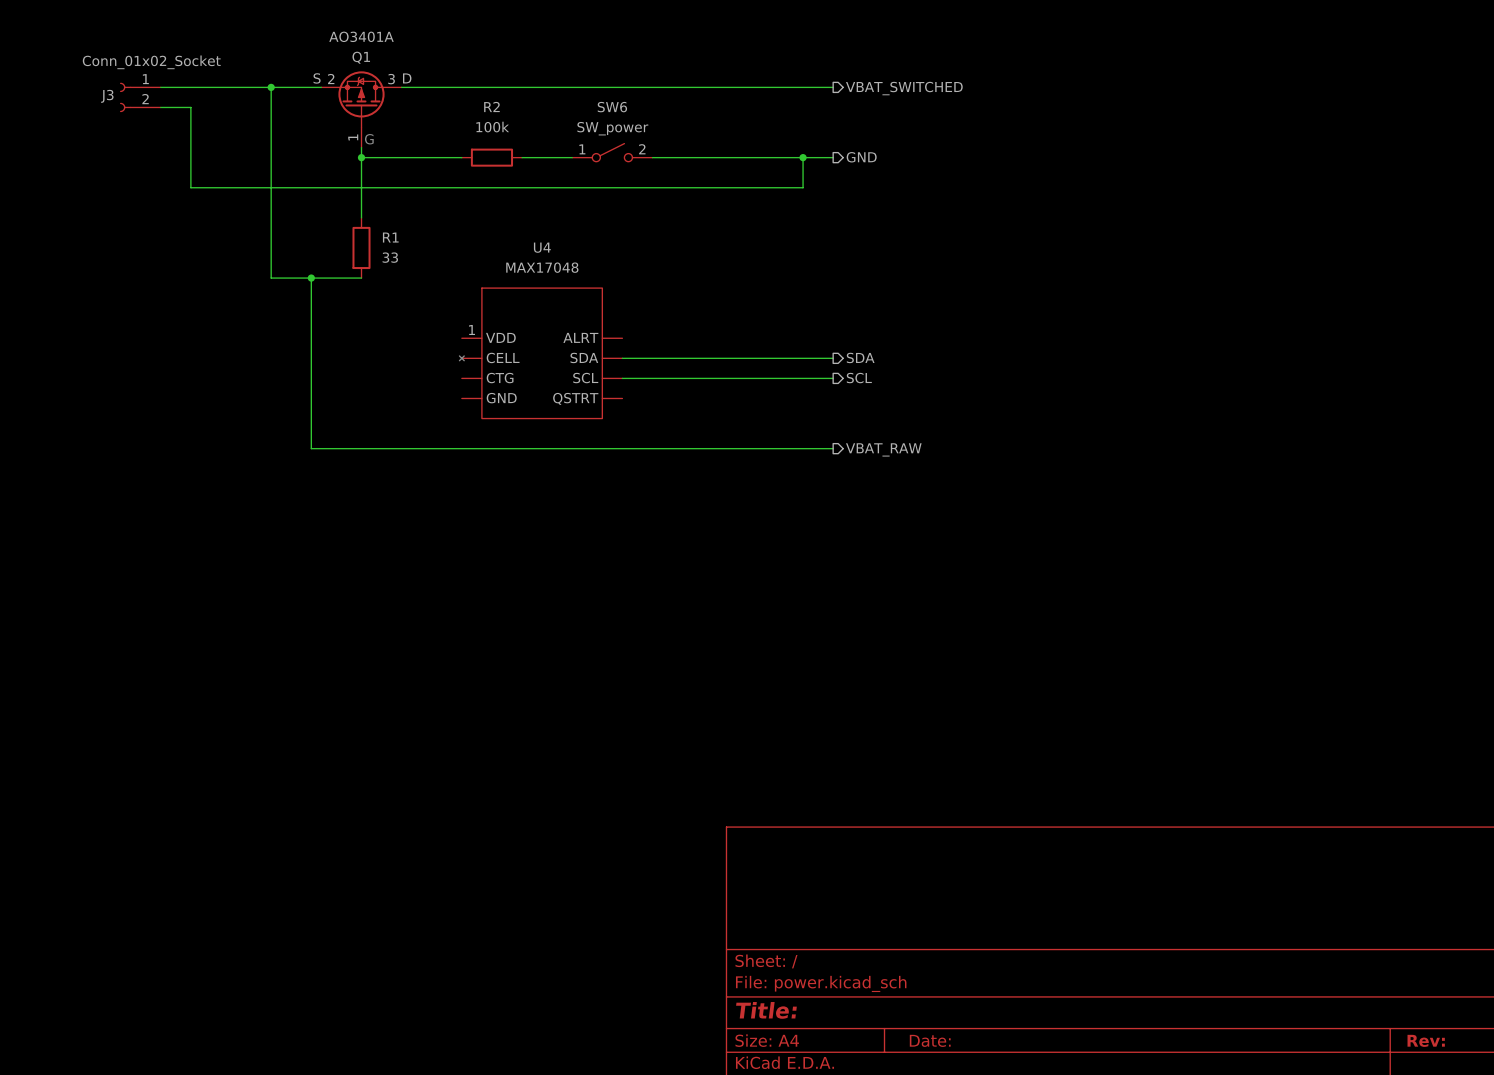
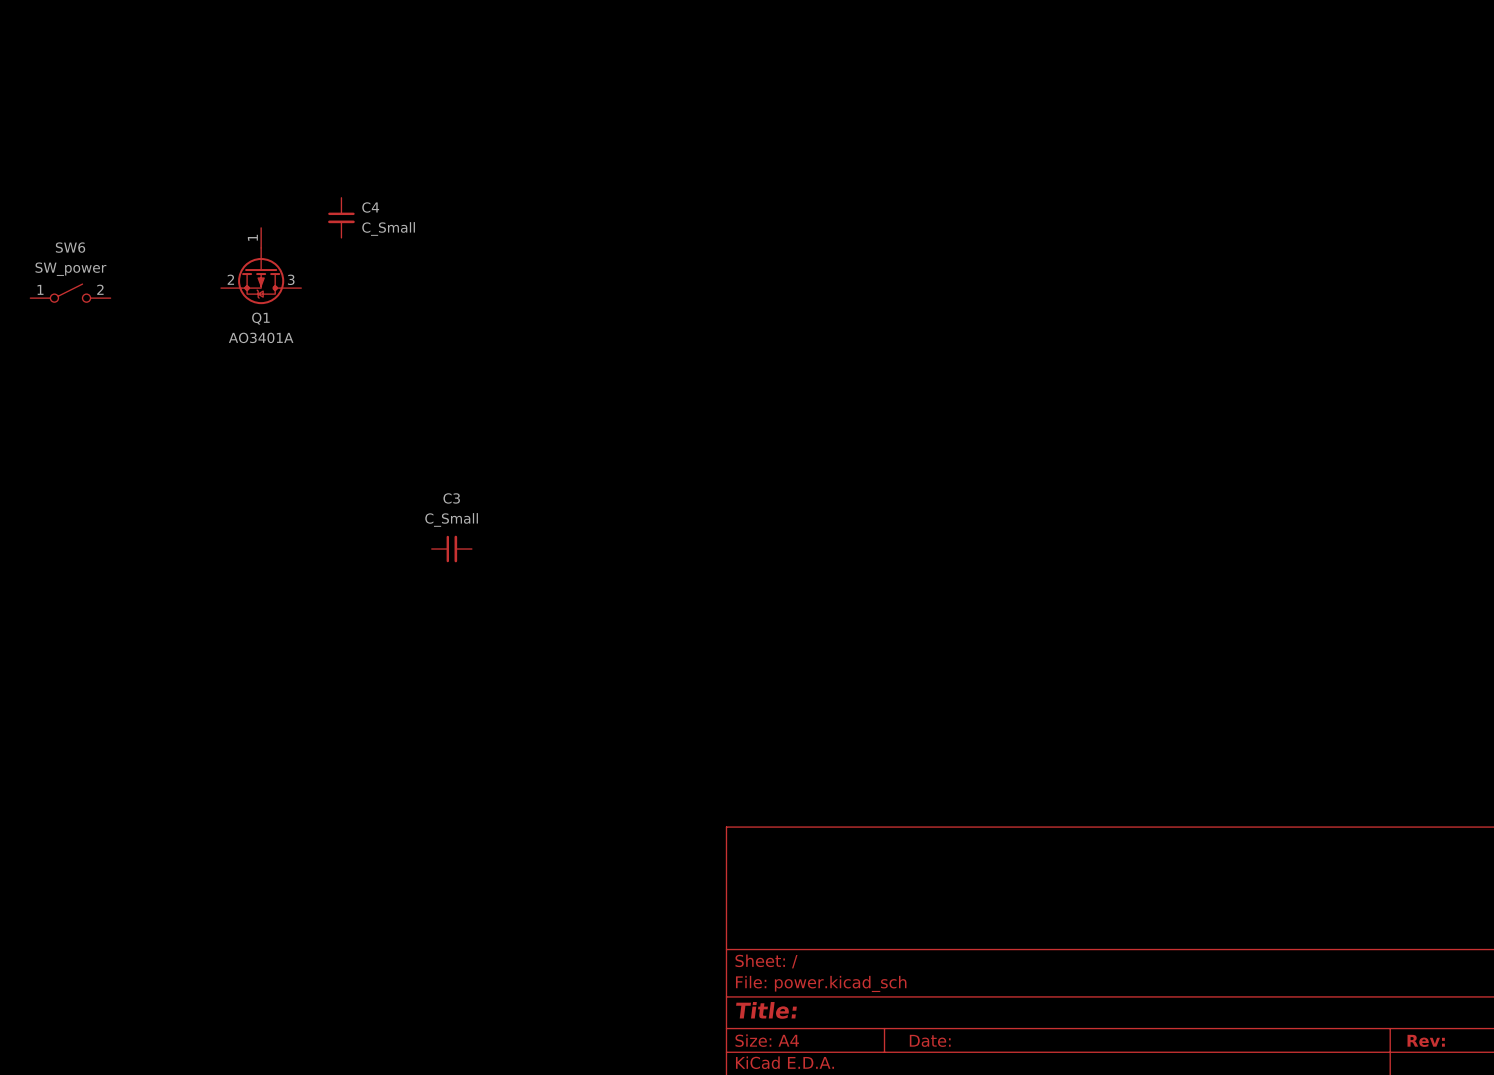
label: S (317, 78) -> none
label: D (407, 78) -> none
wire: (160, 87) (321, 87) -> none
wire: (271, 87) (271, 278) (361, 278) -> none
junction: (271, 87) -> none
wire: (401, 87) (833, 87) -> none
hierarchical label: VBAT_SWITCHED (904, 88) -> none
J3: Conn_01x02_Socket (140, 97) -> none
Q1 flip: as is (361, 99) -> up-down (261, 276)
wire: (160, 107) (190, 107) (190, 187) (803, 187) (803, 157) -> none
Q1 position: (361, 109) -> (261, 266)
text: G (369, 139) -> none
wire: (361, 147) (361, 217) -> none
SW6 position: (612, 152) -> (70, 293)
wire: (361, 157) (461, 157) -> none
junction: (361, 157) -> none
R2: 100k (491, 157) -> none
wire: (522, 157) (572, 157) -> none
wire: (652, 157) (833, 157) -> none
junction: (803, 157) -> none
hierarchical label: GND (861, 157) -> none
C4: none -> C_Small (341, 217)
R1: 33 (361, 247) -> none
wire: (311, 278) (311, 448) (833, 448) -> none
junction: (311, 278) -> none
U4: MAX17048 (540, 353) -> none
hierarchical label: SDA (860, 357) -> none
wire: (622, 358) (833, 358) -> none
wire: (622, 378) (833, 378) -> none
hierarchical label: SCL (859, 378) -> none
hierarchical label: VBAT_RAW (883, 449) -> none
C3: none -> C_Small (451, 549)

